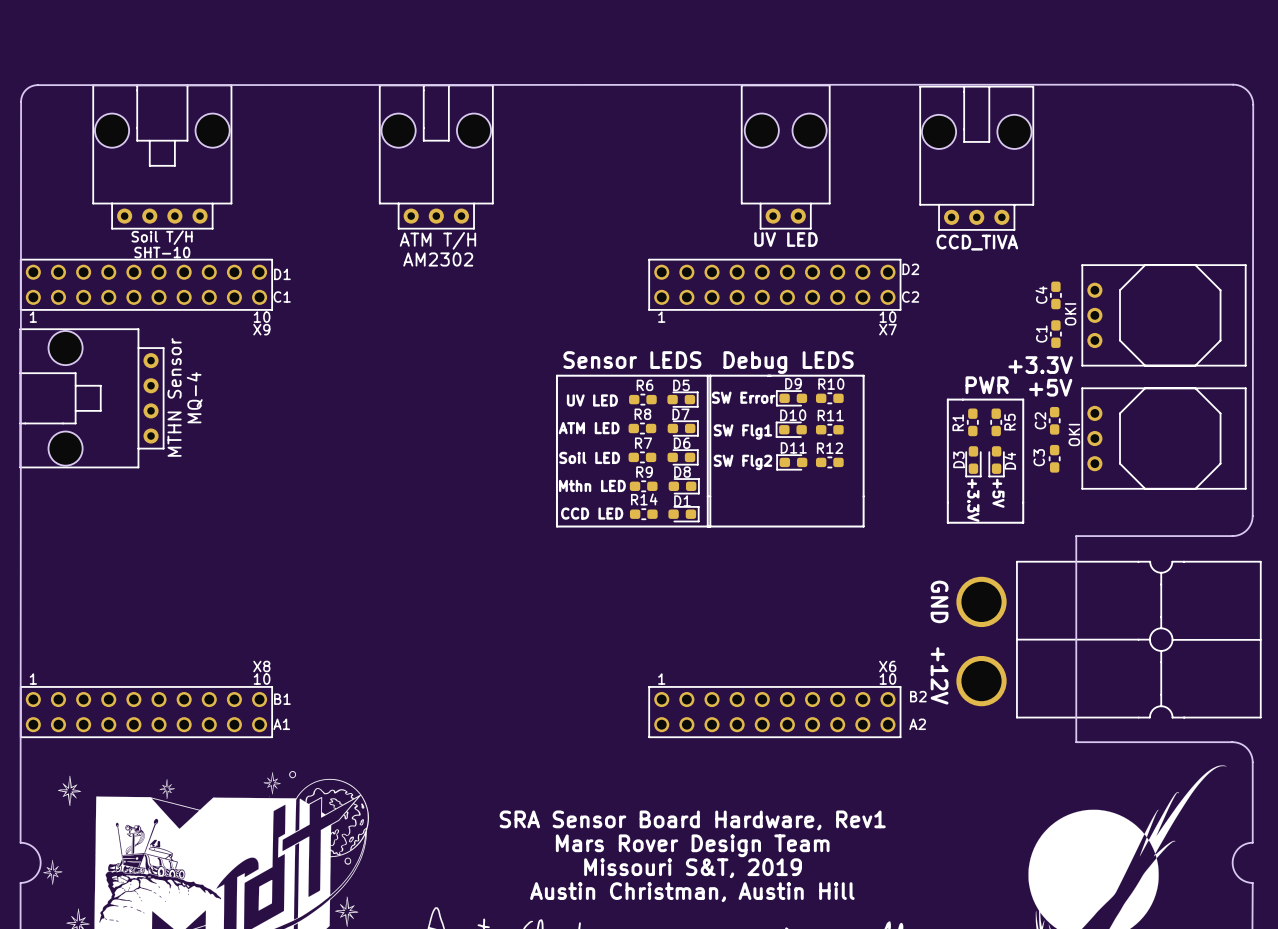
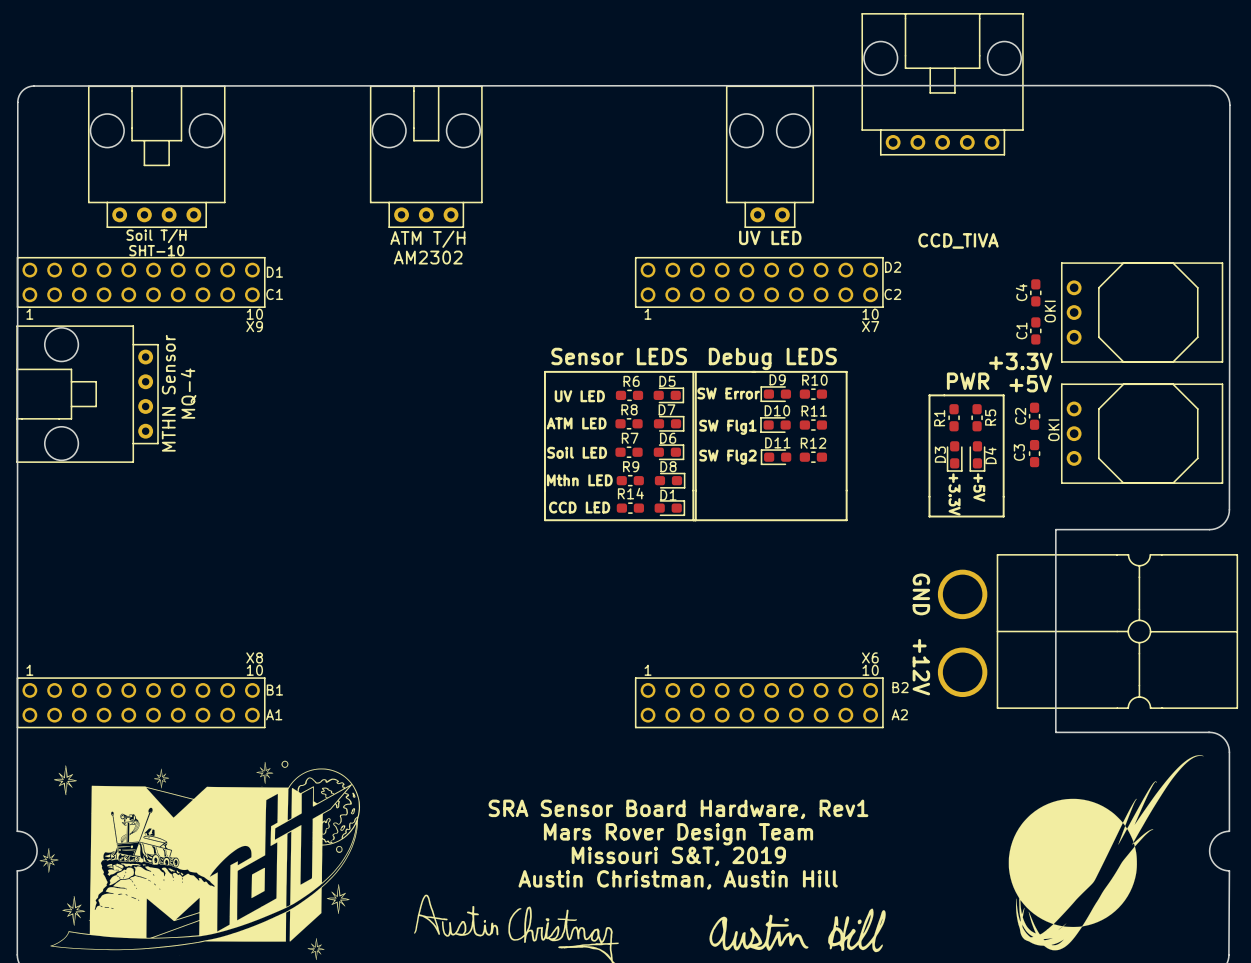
part: none -> (942, 84)
part: (976, 158) -> none

